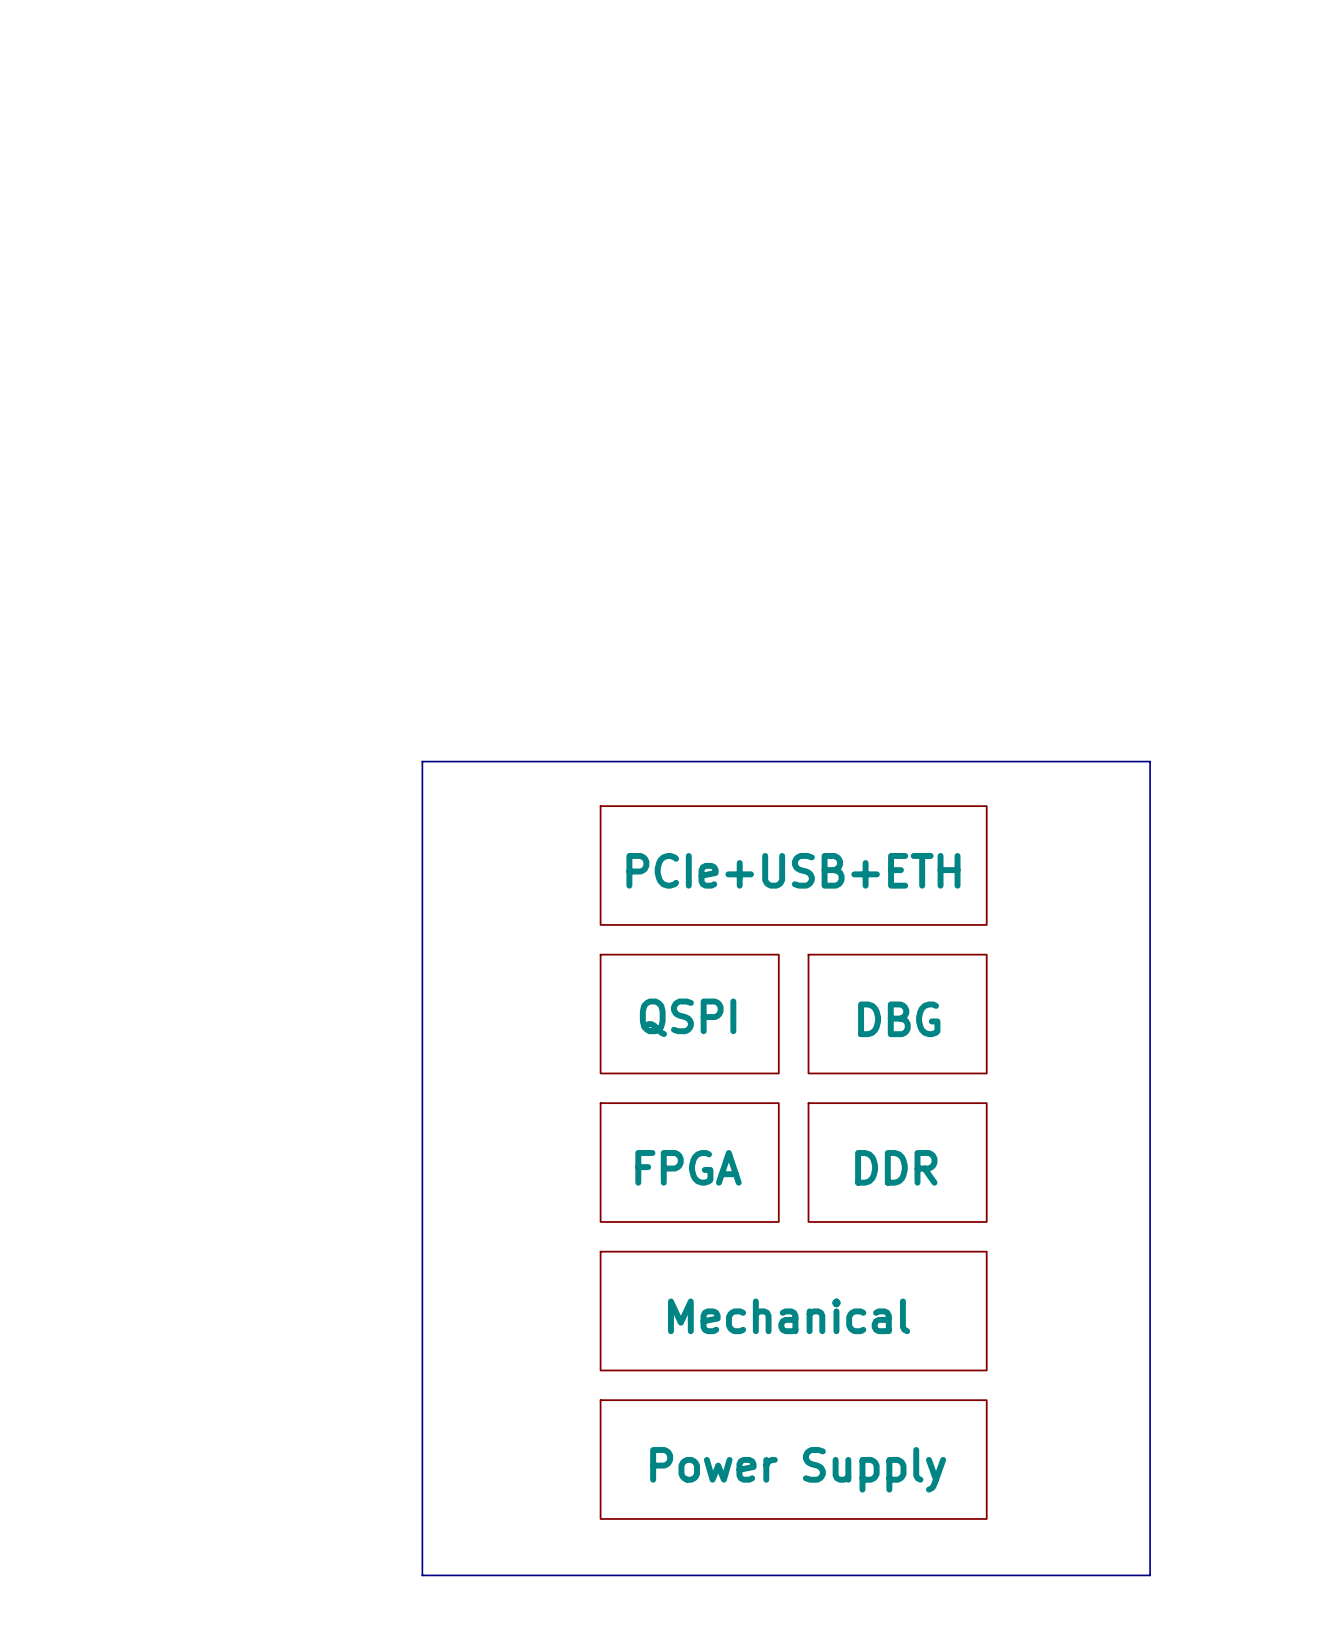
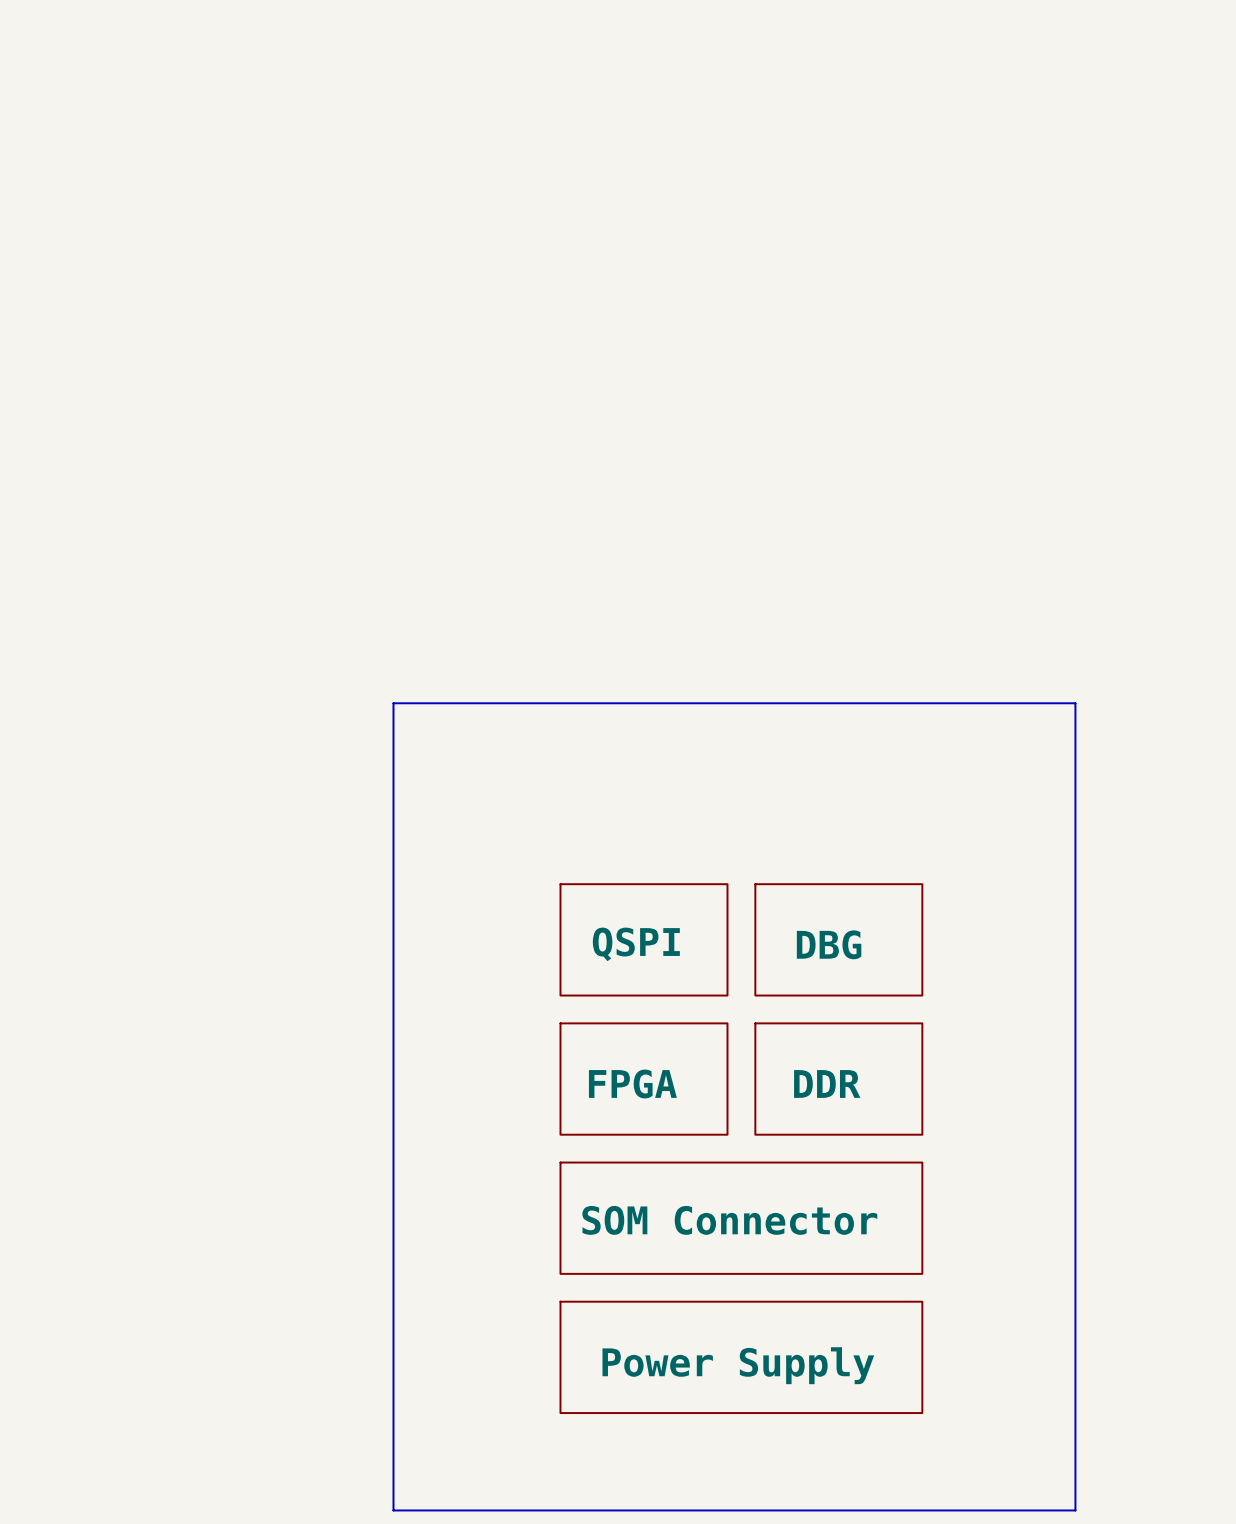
sheet PCIe+USB+ETH: (793, 865) -> none
sheet Mechanical name: Mechanical (789, 1316) -> SOM Connector (729, 1220)
line: (422, 1575) (1150, 1575) -> (393, 1465) (393, 1510) (1075, 1510) (1075, 1465)

